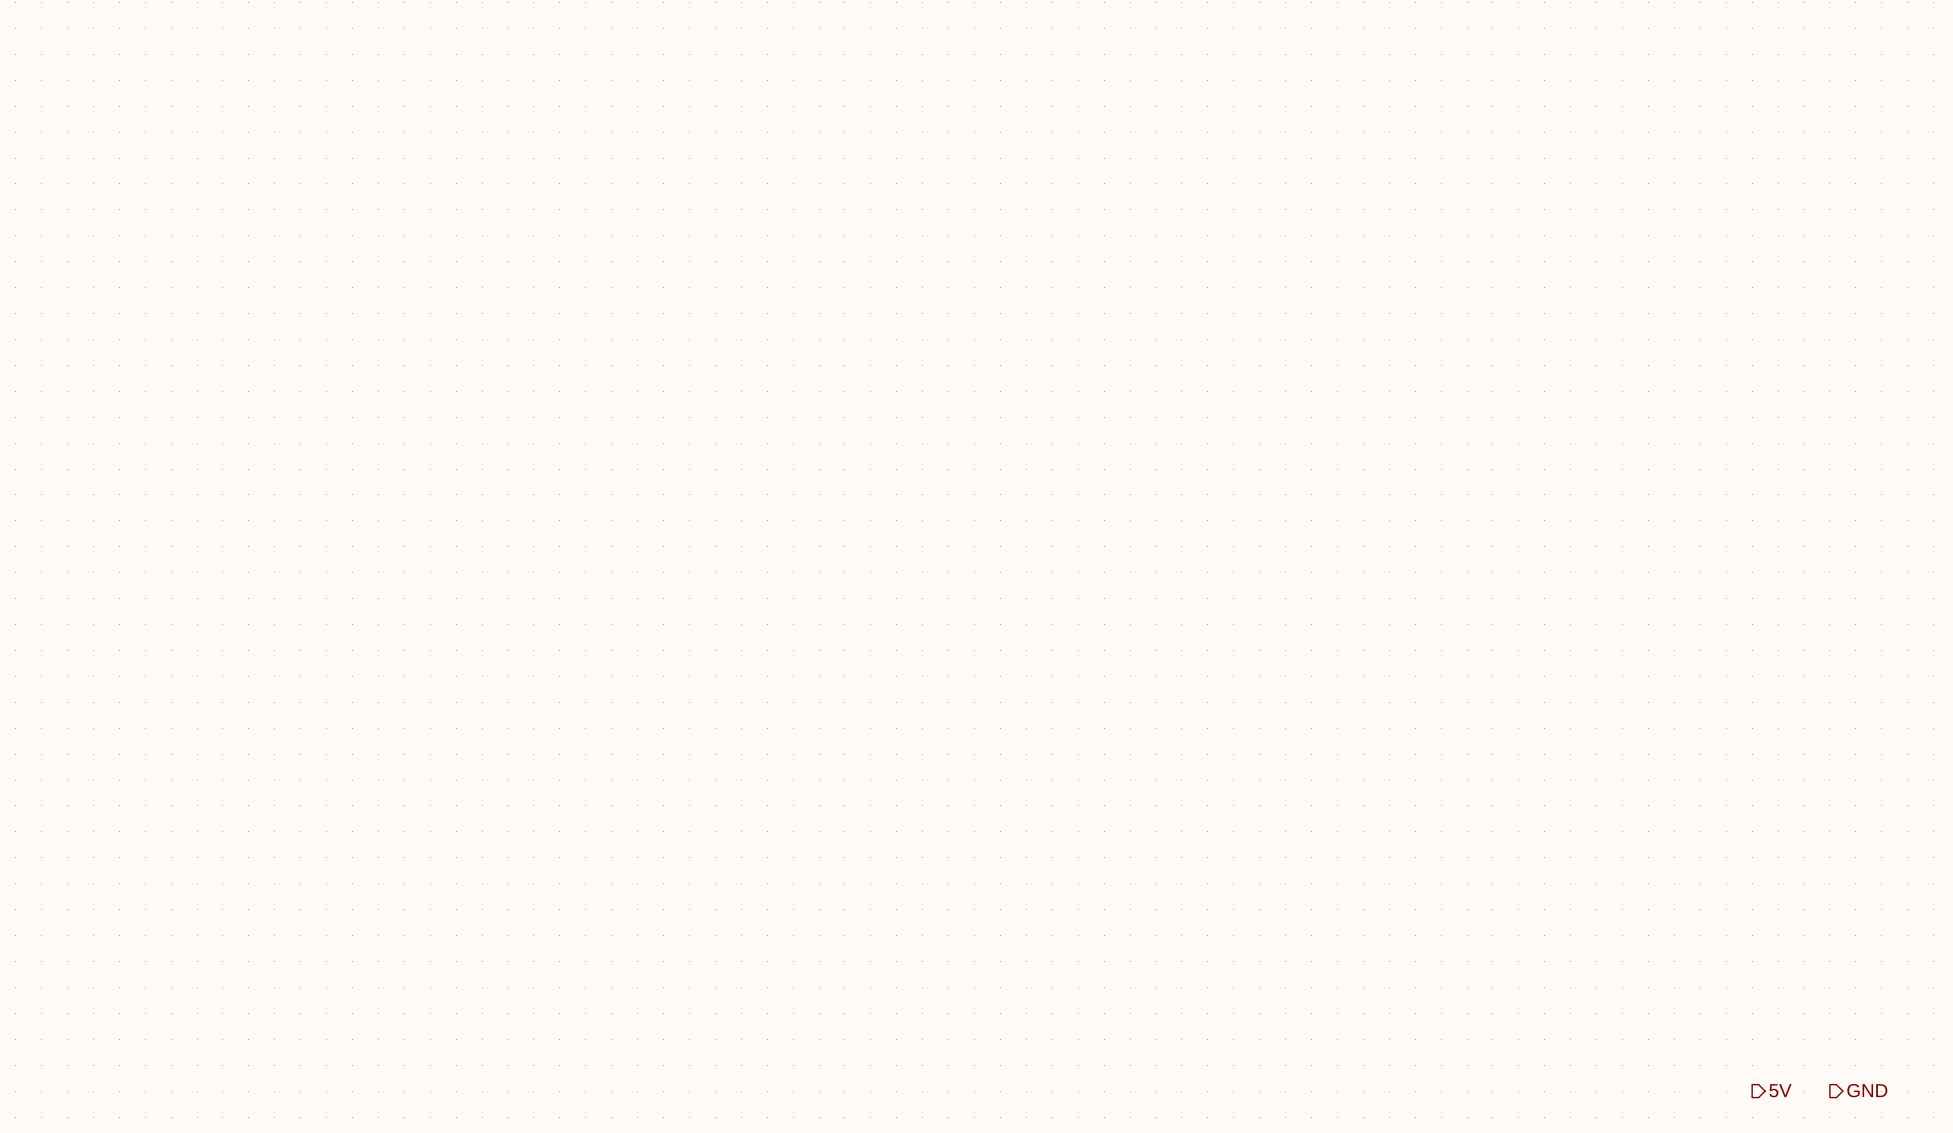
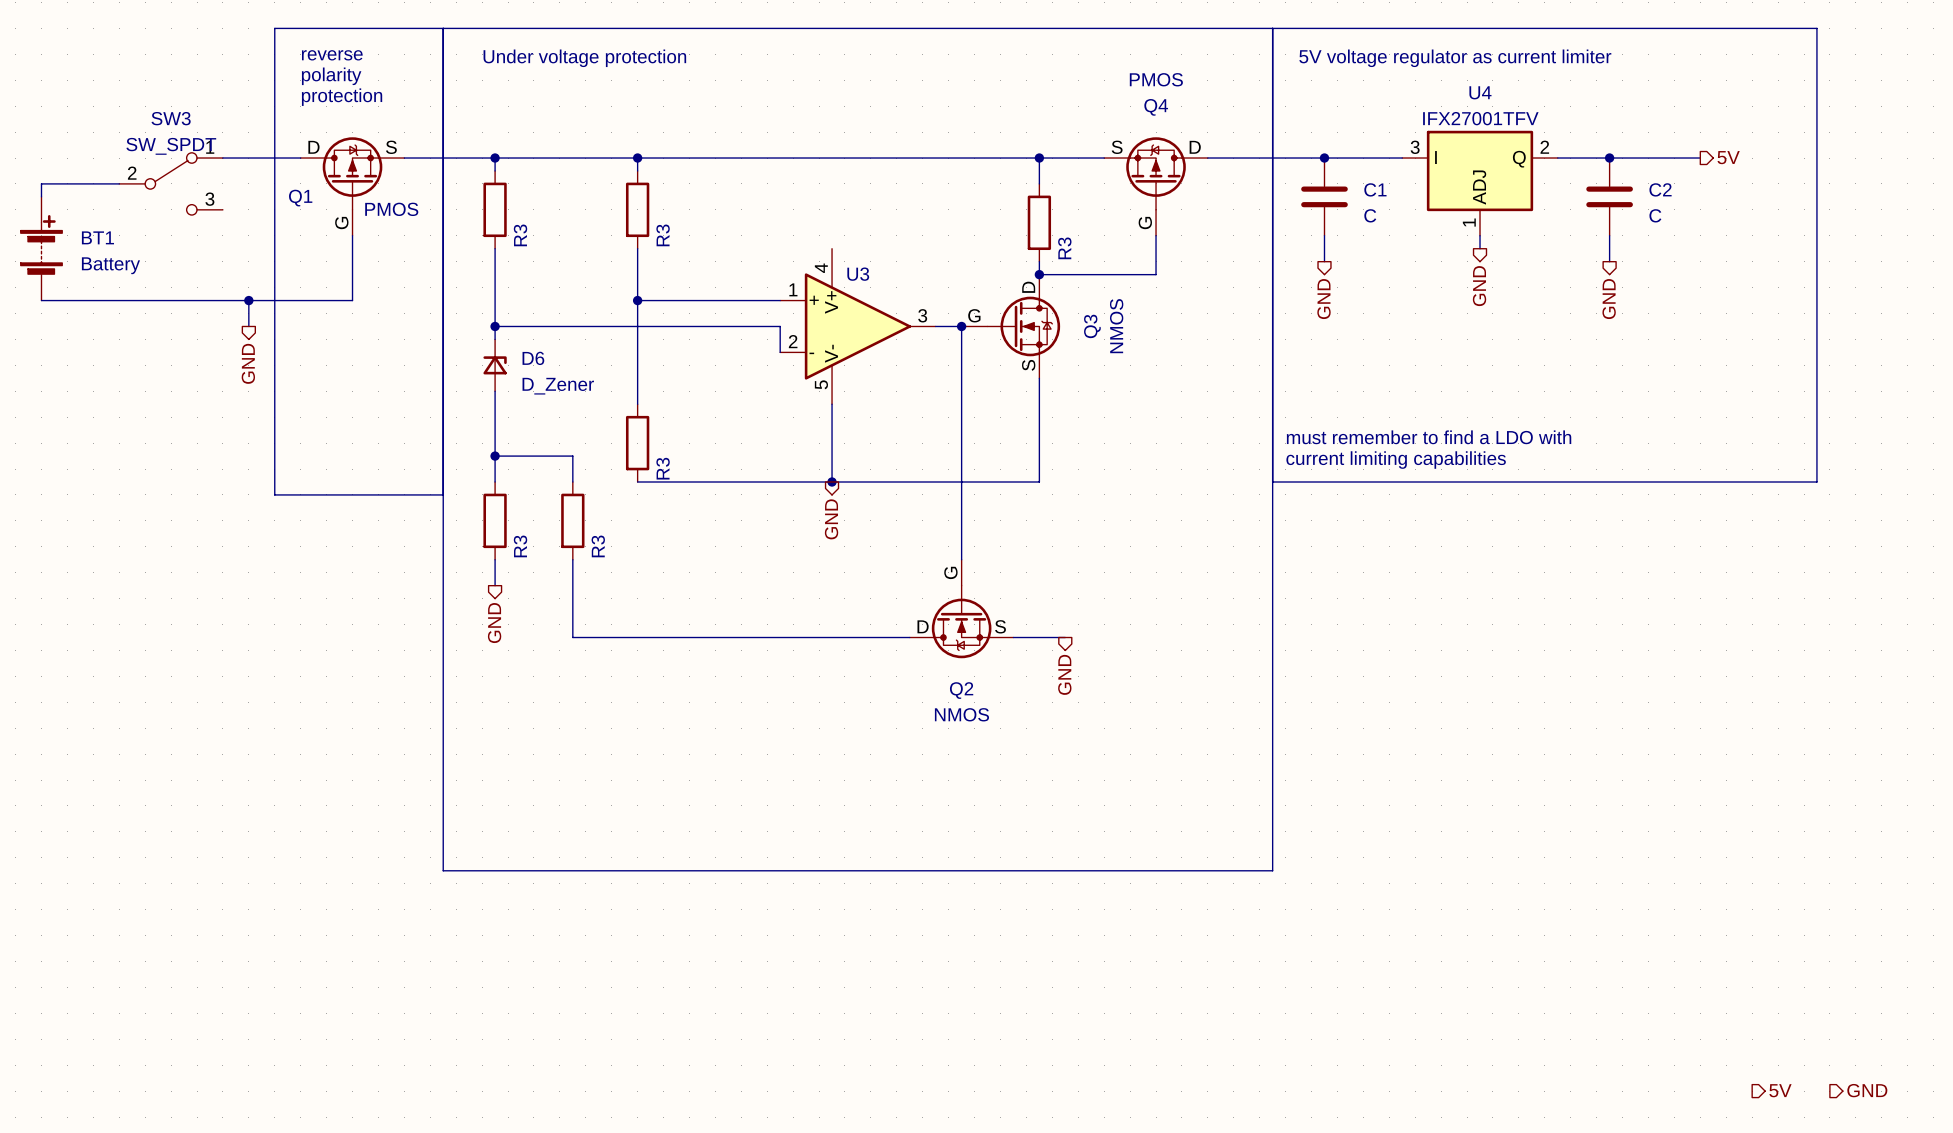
line: none -> (443, 28) (443, 870) (1272, 870) (1272, 28)
text: none -> reverse (332, 55)
text: none -> Under voltage protection (584, 58)
text: none -> 5V voltage regulator as current limiter (1455, 58)
text: none -> polarity (331, 76)
text: none -> protection (342, 97)
hierarchical label: none -> 5V (1728, 157)
wire: none -> (222, 158) (300, 158)
wire: none -> (404, 158) (1104, 158)
wire: none -> (495, 158) (495, 170)
junction: none -> (495, 158)
wire: none -> (637, 158) (637, 170)
junction: none -> (637, 158)
wire: none -> (1039, 158) (1039, 183)
junction: none -> (1039, 158)
wire: none -> (1207, 158) (1402, 158)
junction: none -> (1324, 158)
wire: none -> (1557, 158) (1700, 158)
junction: none -> (1609, 158)
wire: none -> (119, 183) (41, 183) (41, 196)
SW3: none -> SW_SPDT (171, 183)
U4: none -> IFX27001TFV (1480, 183)
Q1: none -> PMOS (352, 186)
Q4: none -> PMOS (1156, 186)
C1: none -> C (1324, 196)
C2: none -> C (1609, 196)
R3: none -> (495, 209)
R3: none -> (637, 209)
R3: none -> (1039, 222)
wire: none -> (352, 235) (352, 300) (41, 300)
wire: none -> (1156, 235) (1156, 274) (1039, 274) (1039, 261)
wire: none -> (1324, 235) (1324, 261)
wire: none -> (1480, 235) (1480, 248)
wire: none -> (1609, 235) (1609, 261)
BT1: none -> Battery (41, 248)
wire: none -> (495, 248) (495, 339)
wire: none -> (637, 248) (637, 404)
junction: none -> (1039, 274)
hierarchical label: none -> GND (1479, 286)
hierarchical label: none -> GND (1324, 299)
hierarchical label: none -> GND (1609, 299)
wire: none -> (248, 300) (248, 326)
junction: none -> (248, 300)
wire: none -> (637, 300) (780, 300)
junction: none -> (637, 300)
wire: none -> (495, 326) (780, 326) (780, 352)
junction: none -> (495, 326)
U3: none -> (857, 326)
wire: none -> (935, 326) (961, 326) (961, 559)
junction: none -> (961, 326)
Q3: none -> NMOS (1010, 326)
hierarchical label: none -> GND (248, 363)
D6: none -> D_Zener (495, 365)
wire: none -> (1039, 378) (1039, 482) (637, 482)
wire: none -> (495, 391) (495, 482)
wire: none -> (832, 404) (832, 482)
text: none -> must remember to find a LDO with (1429, 437)
R3: none -> (637, 443)
wire: none -> (495, 456) (572, 456) (572, 482)
junction: none -> (495, 456)
text: none -> current limiting capabilities (1396, 460)
junction: none -> (832, 482)
line: none -> (1272, 482) (1816, 482) (1816, 28) (274, 28) (274, 494) (443, 494)
hierarchical label: none -> GND (831, 519)
R3: none -> (495, 520)
R3: none -> (572, 520)
wire: none -> (495, 559) (495, 585)
wire: none -> (572, 559) (572, 637) (909, 637)
Q2: none -> NMOS (961, 609)
hierarchical label: none -> GND (494, 623)
wire: none -> (1013, 637) (1065, 637)
hierarchical label: none -> GND (1064, 674)

